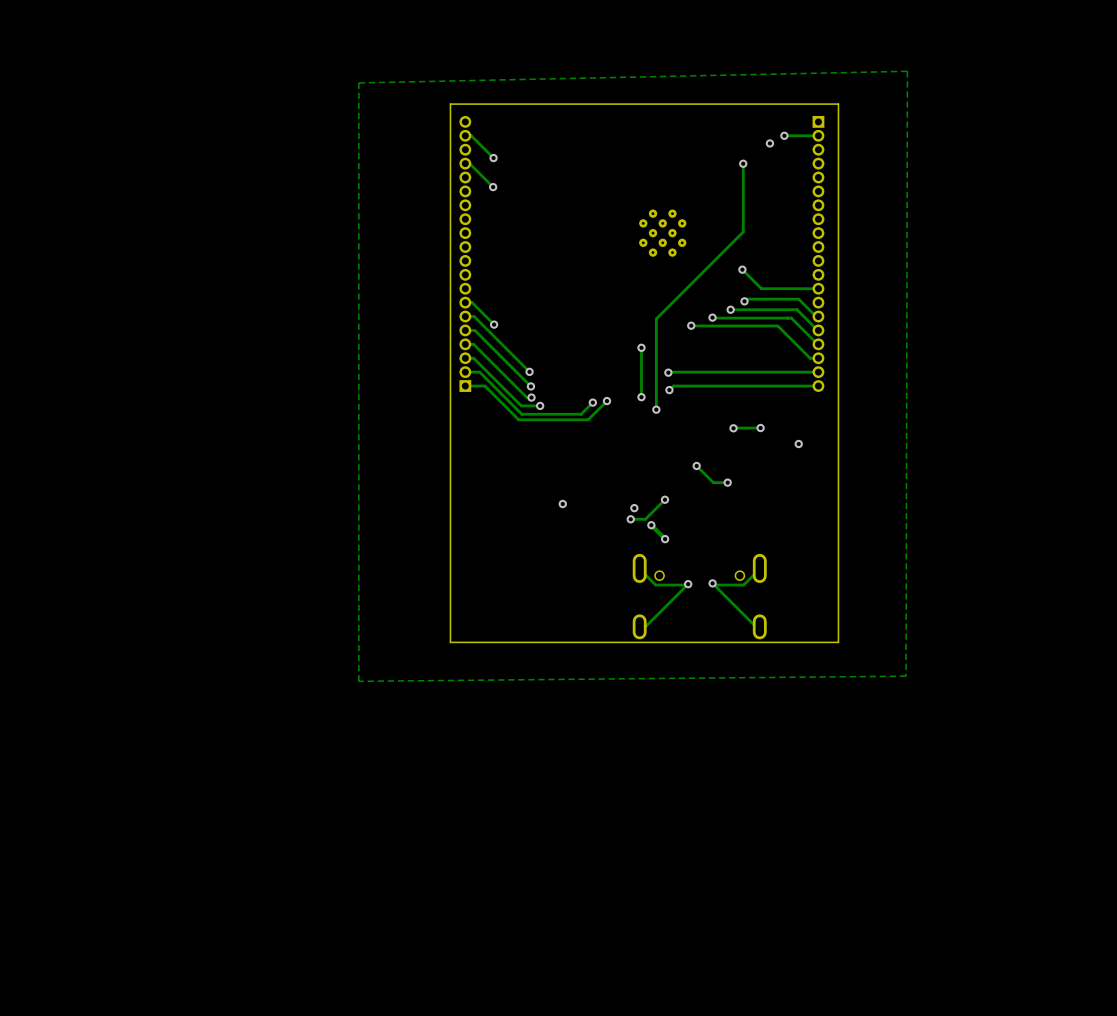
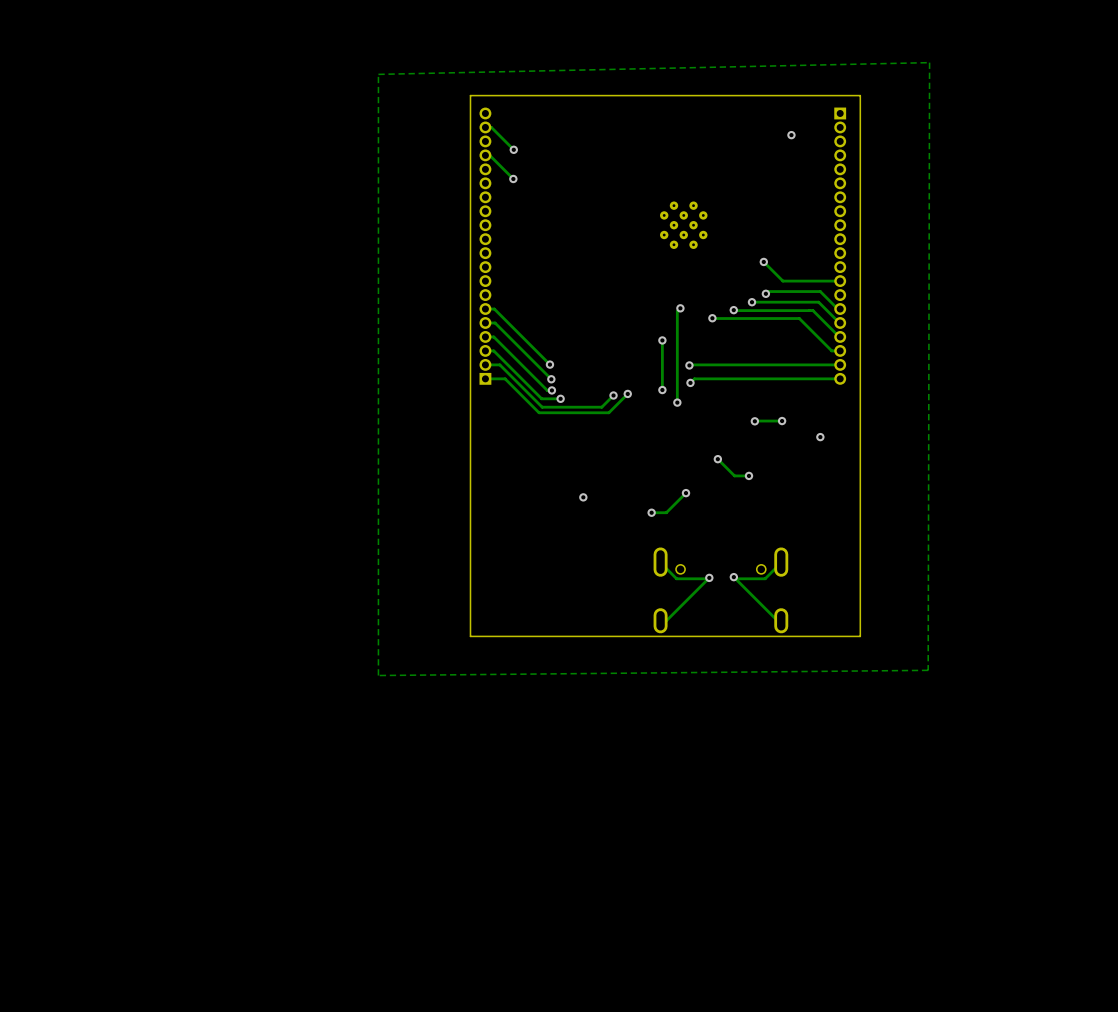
via: (784, 135) -> none
track: (818, 135) (784, 135) -> none
track: (743, 163) (743, 232) (659, 315) -> none
via: (743, 163) -> none
track: (465, 302) (472, 302) (494, 324) -> none
via: none -> (680, 308)
via: (494, 324) -> none
via: (634, 508) -> none
track: (651, 525) (665, 538) -> none
via: (651, 525) -> none
via: (665, 539) -> none

